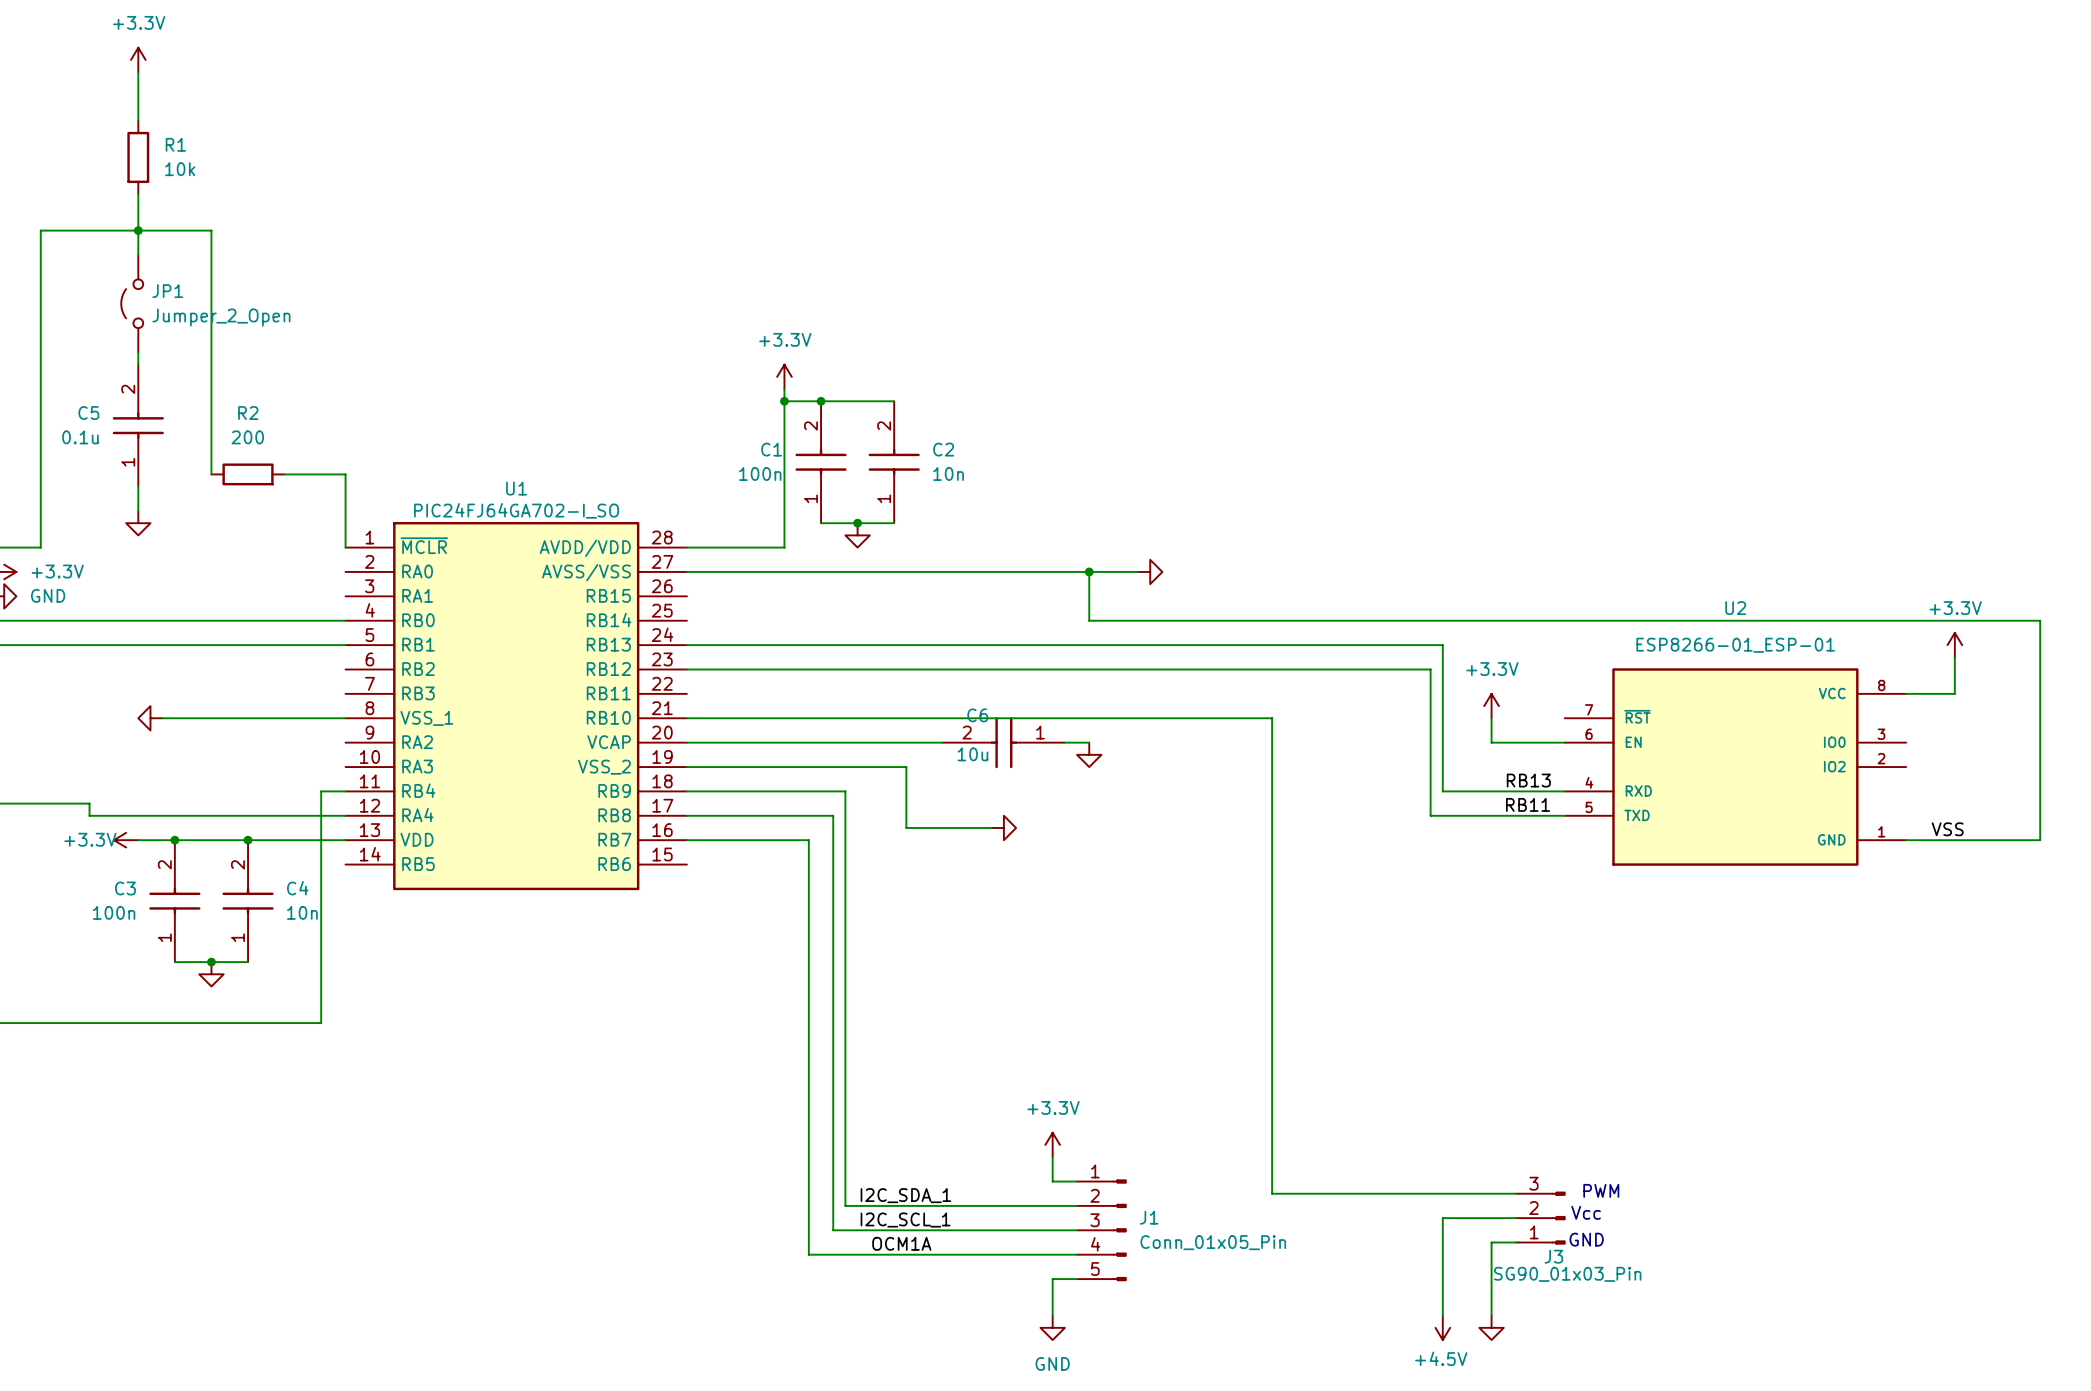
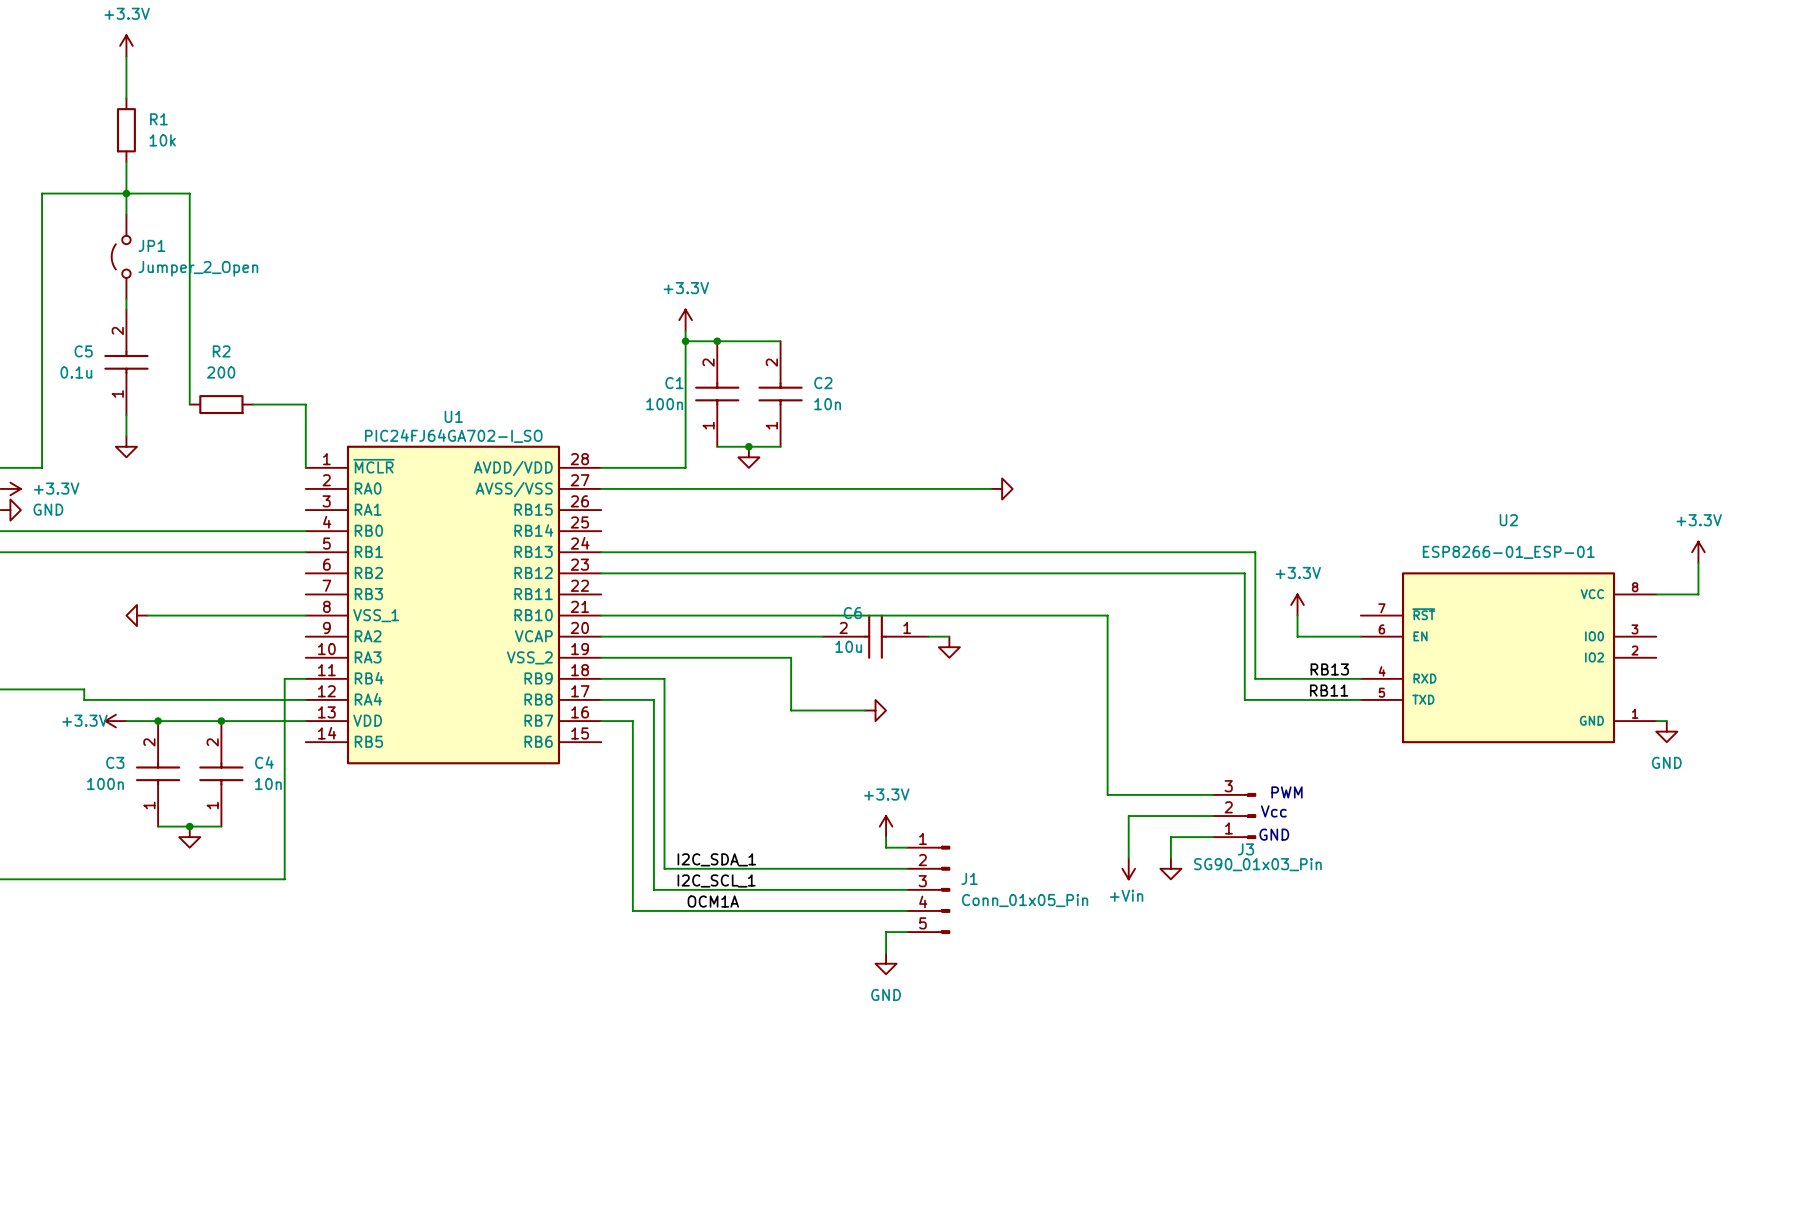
wire: (1089, 571) (1089, 620) (2040, 620) (2040, 840) (1918, 840) -> none
junction: (1089, 571) -> none
wire: (760, 791) (845, 791) (845, 1205) (1077, 1205) -> (664, 678) (664, 868) (907, 868)
wire: (747, 815) (833, 815) (833, 1230) (1077, 1230) -> (653, 699) (653, 889) (907, 889)
label: VSS (1947, 829) -> none
wire: (723, 840) (808, 840) (808, 1254) (1077, 1254) -> (632, 721) (632, 910) (907, 910)
power symbol: none -> GND (1666, 731)
text: none -> PWM (1286, 792)
wire: (1272, 925) (1272, 1193) (1515, 1193) -> (1107, 794) (1213, 794)
text: none -> Vcc (1273, 811)
wire: none -> (1213, 816) (1128, 816) (1128, 858)
text: none -> GND (1274, 834)
wire: none -> (886, 837) (886, 847) (907, 847)
wire: none -> (1213, 837) (1170, 837) (1170, 858)
power symbol: none -> +Vin (1128, 868)
power symbol: none -> (1170, 868)
wire: none -> (907, 932) (886, 932) (886, 953)
power symbol position: +3.3V (1052, 1144) -> +3.3V (886, 826)
wire: (1052, 1157) (1052, 1181) (1077, 1181) -> none
text: PWM (1601, 1190) -> none
label position: I2C_SDA_1 (905, 1195) -> I2C_SDA_1 (716, 859)
text: Vcc (1586, 1212) -> none
wire: (1515, 1218) (1442, 1218) (1442, 1315) -> none
J3 position: (1540, 1218) -> (1234, 816)
label position: I2C_SCL_1 (905, 1220) -> I2C_SCL_1 (716, 880)
J1 position: (1101, 1230) -> (928, 889)
text: GND (1586, 1239) -> none
wire: (1515, 1242) (1491, 1242) (1491, 1315) -> none
label position: OCM1A (901, 1243) -> OCM1A (713, 901)
wire: (1077, 1279) (1052, 1279) (1052, 1315) -> none
power symbol position: GND (1052, 1327) -> GND (886, 963)
power symbol: +4.5V (1442, 1327) -> none
power symbol: (1491, 1327) -> none

